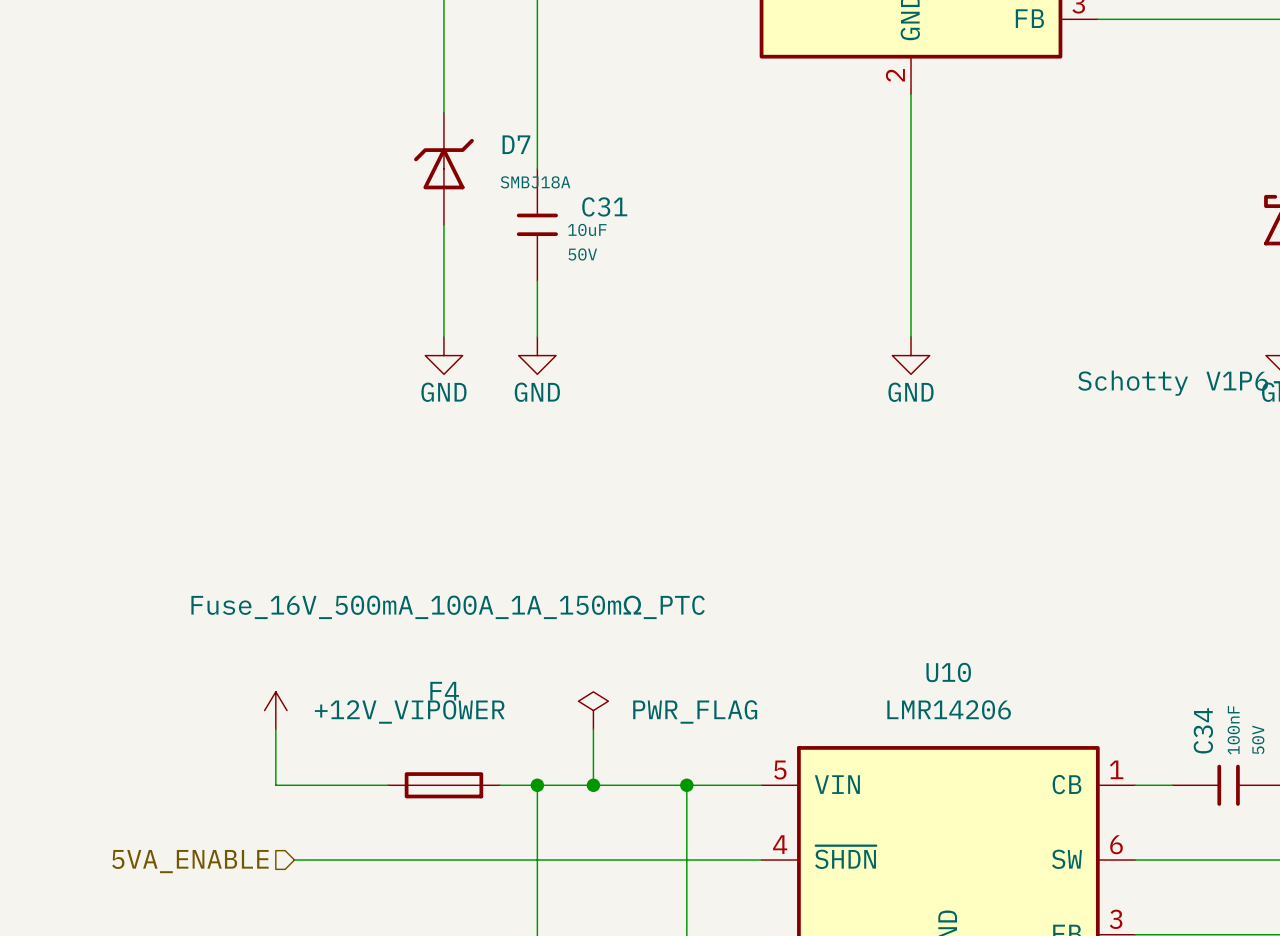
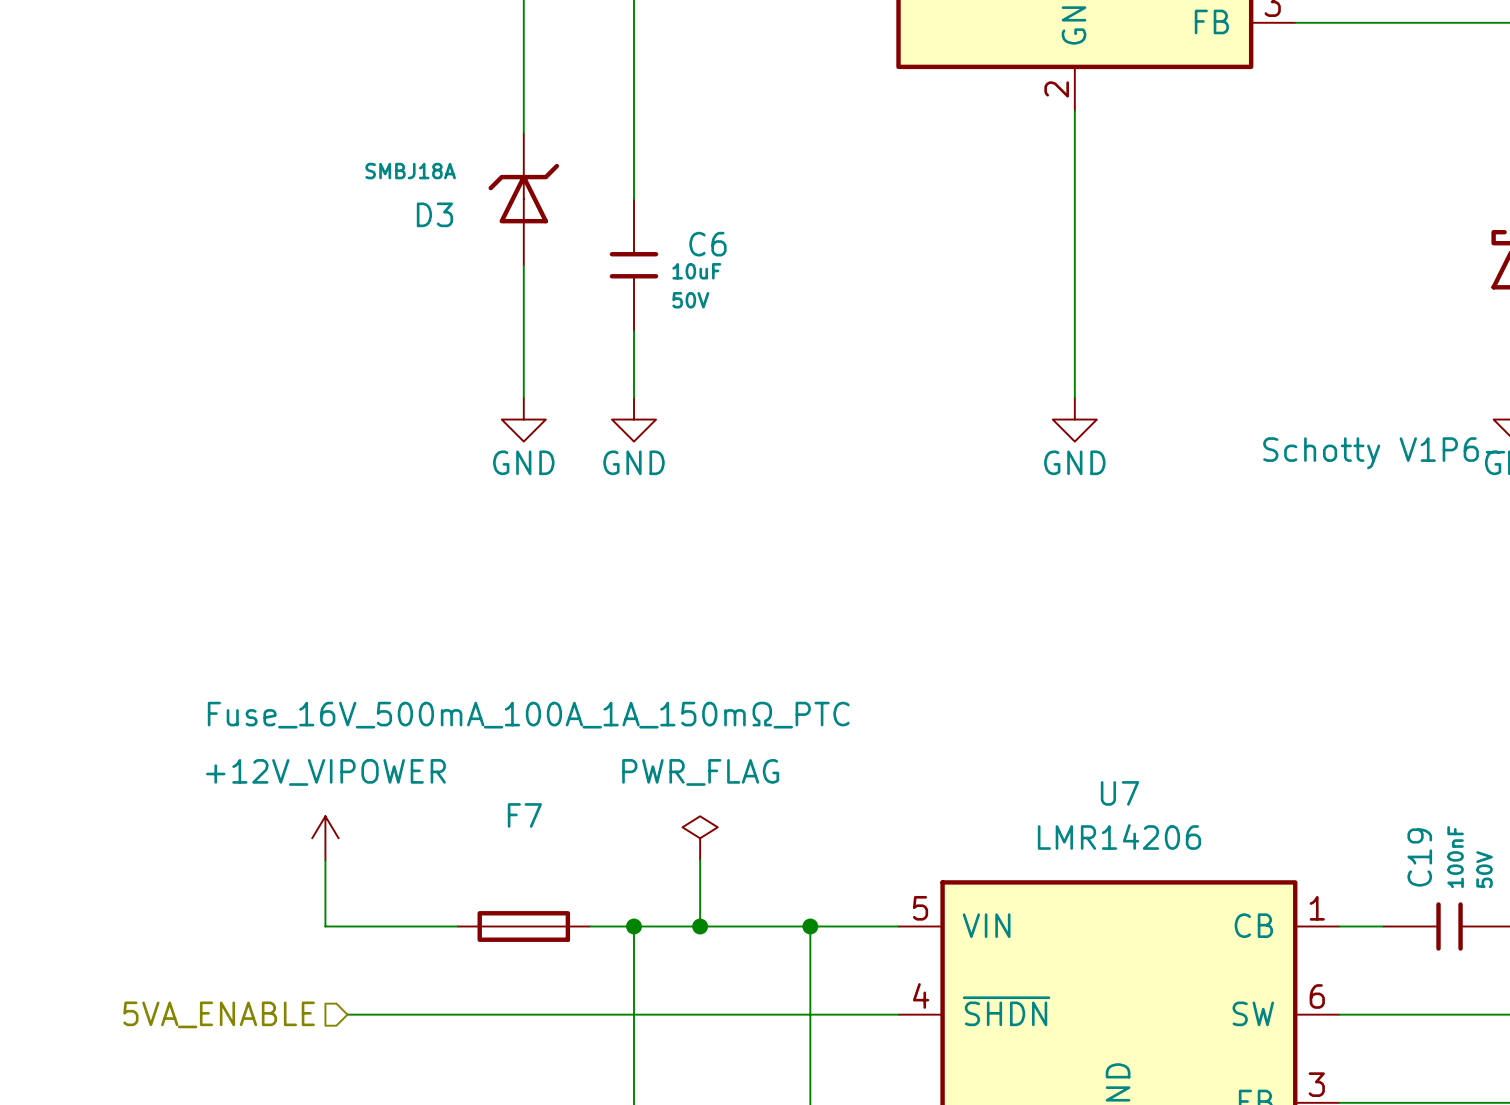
D7 name: D7 (516, 144) -> D3 (434, 214)
D7 value position: SMBJ18A (535, 182) -> SMBJ18A (410, 171)
C31 name: C31 (604, 206) -> C6 (707, 244)
U10 name: U10 (948, 672) -> U7 (1119, 793)
F4 name: F4 (444, 691) -> F7 (524, 815)
power symbol text position: +12V_VIPOWER (409, 711) -> +12V_VIPOWER (325, 772)
power symbol text position: PWR_FLAG (695, 711) -> PWR_FLAG (700, 772)
C34 name: C34 (1203, 730) -> C19 (1419, 857)

